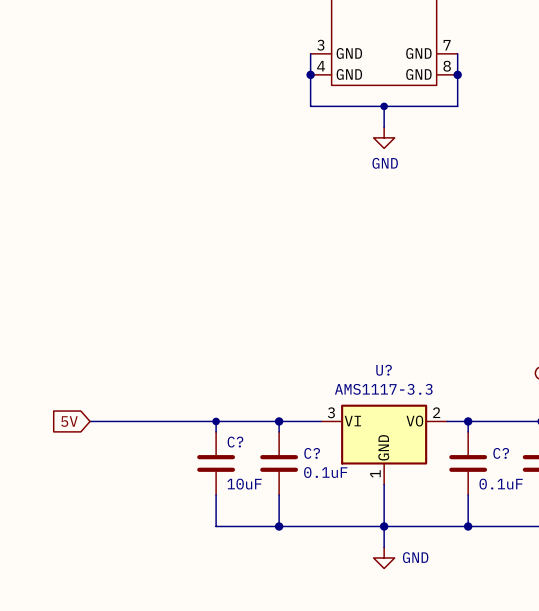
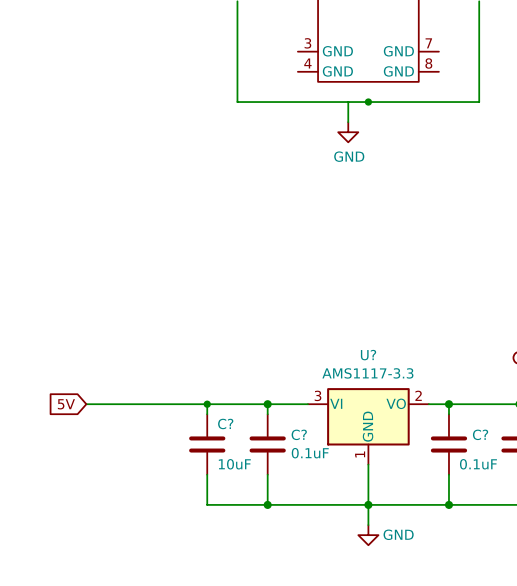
wire: (310, 53) (310, 106) -> (237, 1) (237, 102) (297, 102)
wire: (457, 53) (457, 106) -> (479, 1) (479, 102) (438, 102)
junction: (310, 74) -> none
junction: (457, 74) -> none
wire: (384, 106) (384, 127) -> (348, 102) (348, 122)
power symbol position: GND (384, 137) -> GND (348, 132)

